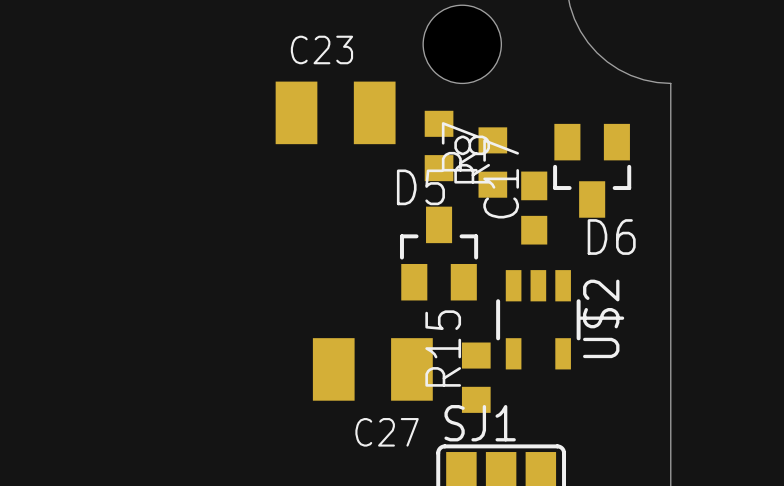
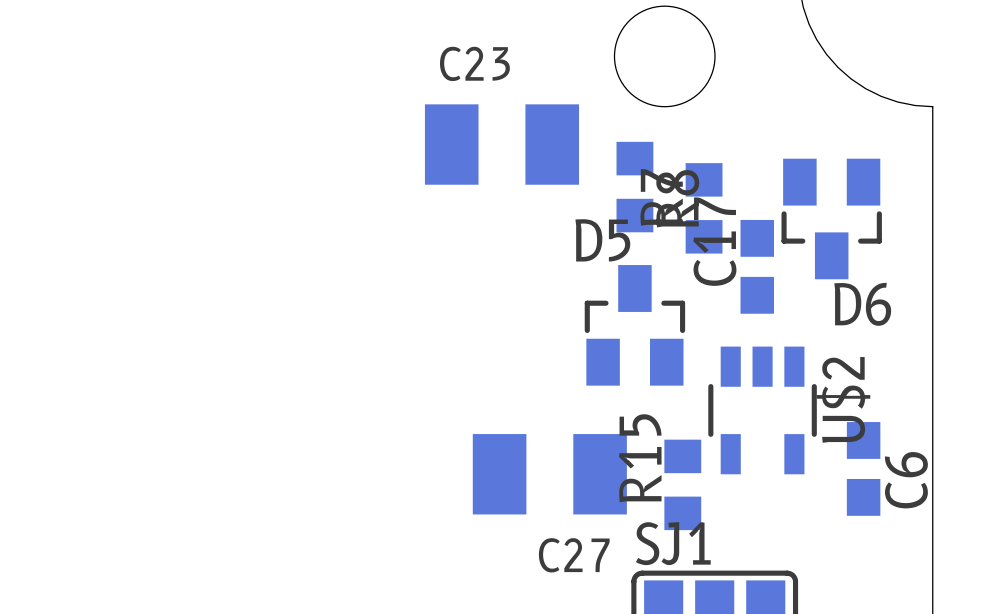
C6: none -> (863, 468)

